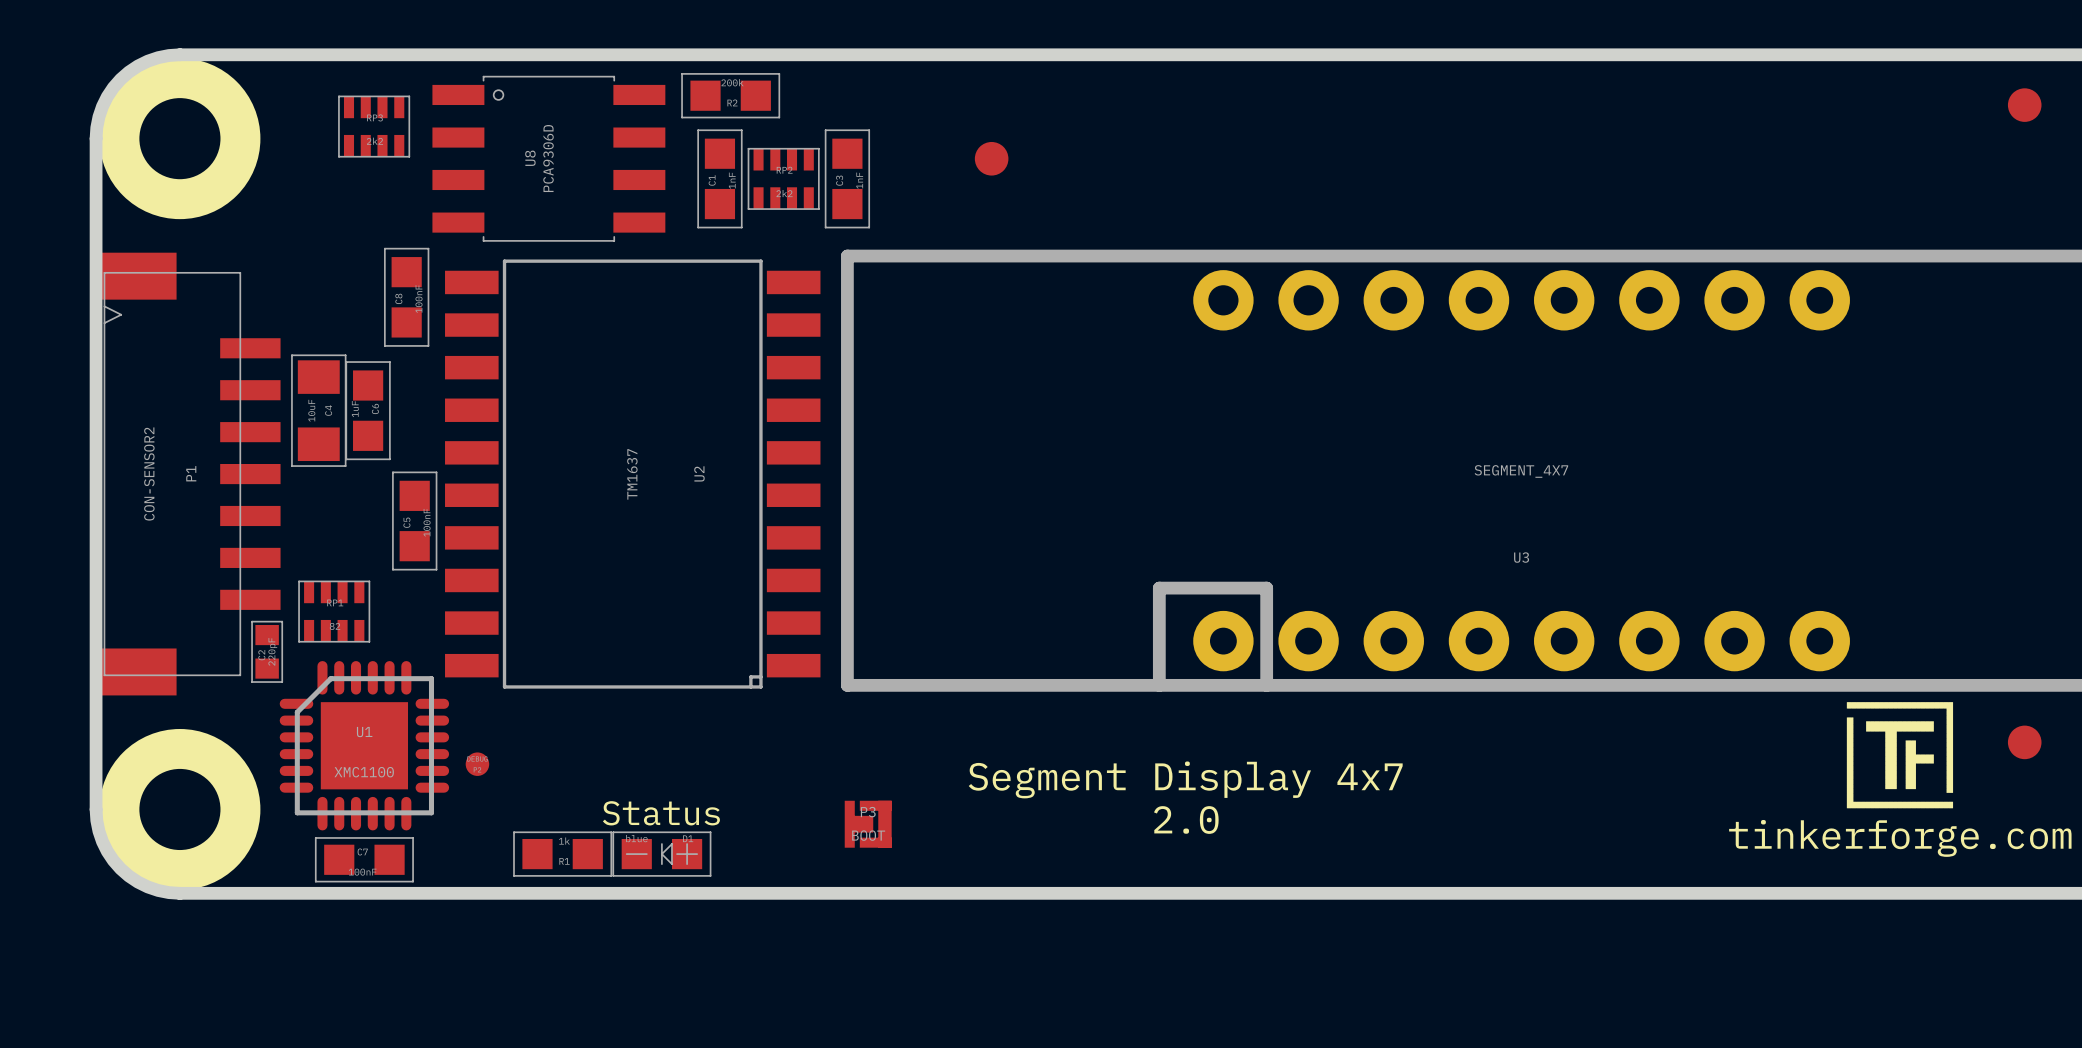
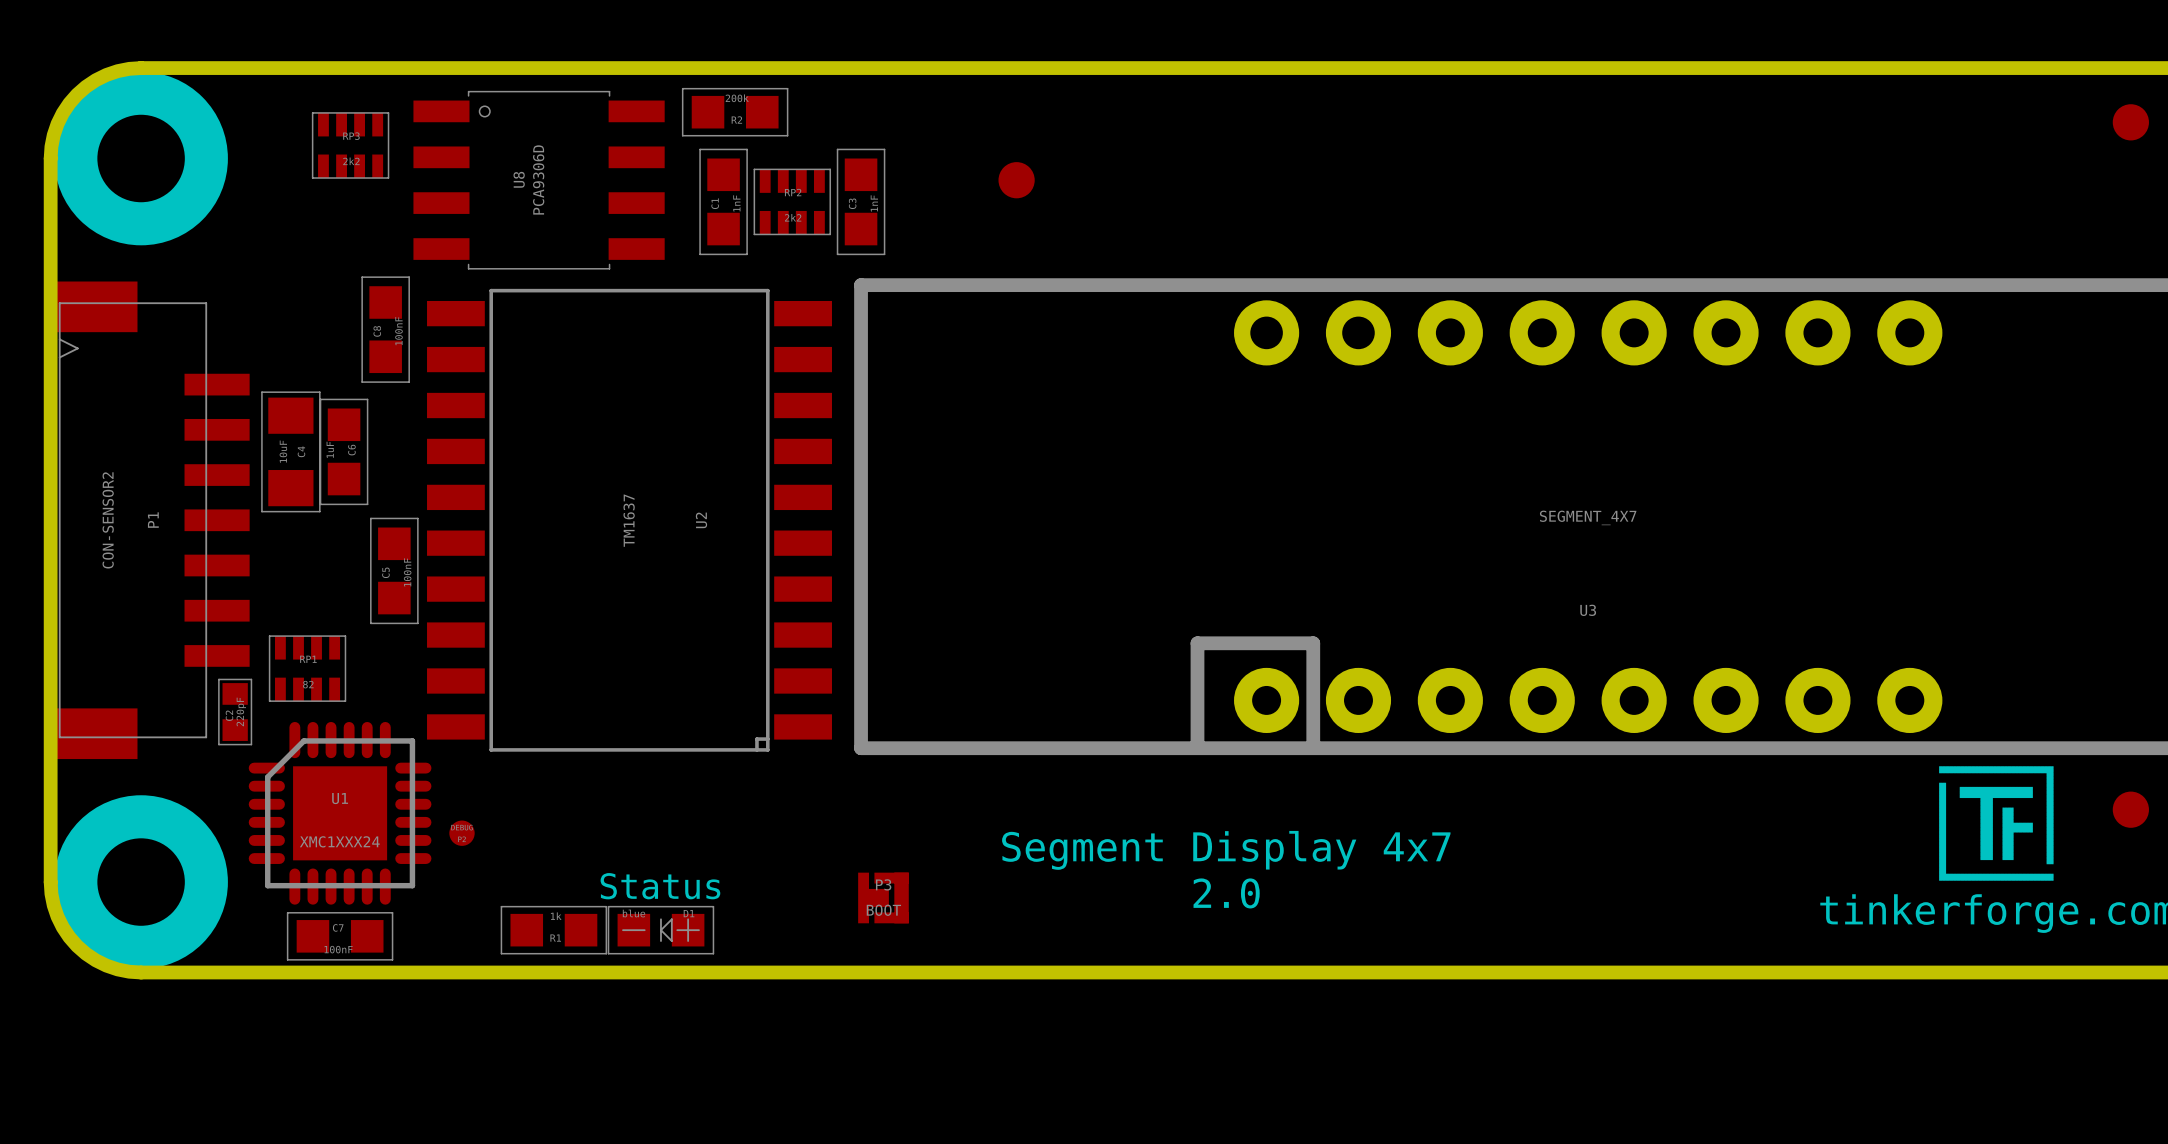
U1 value: XMC1100 (364, 772) -> XMC1XXX24 (339, 841)

